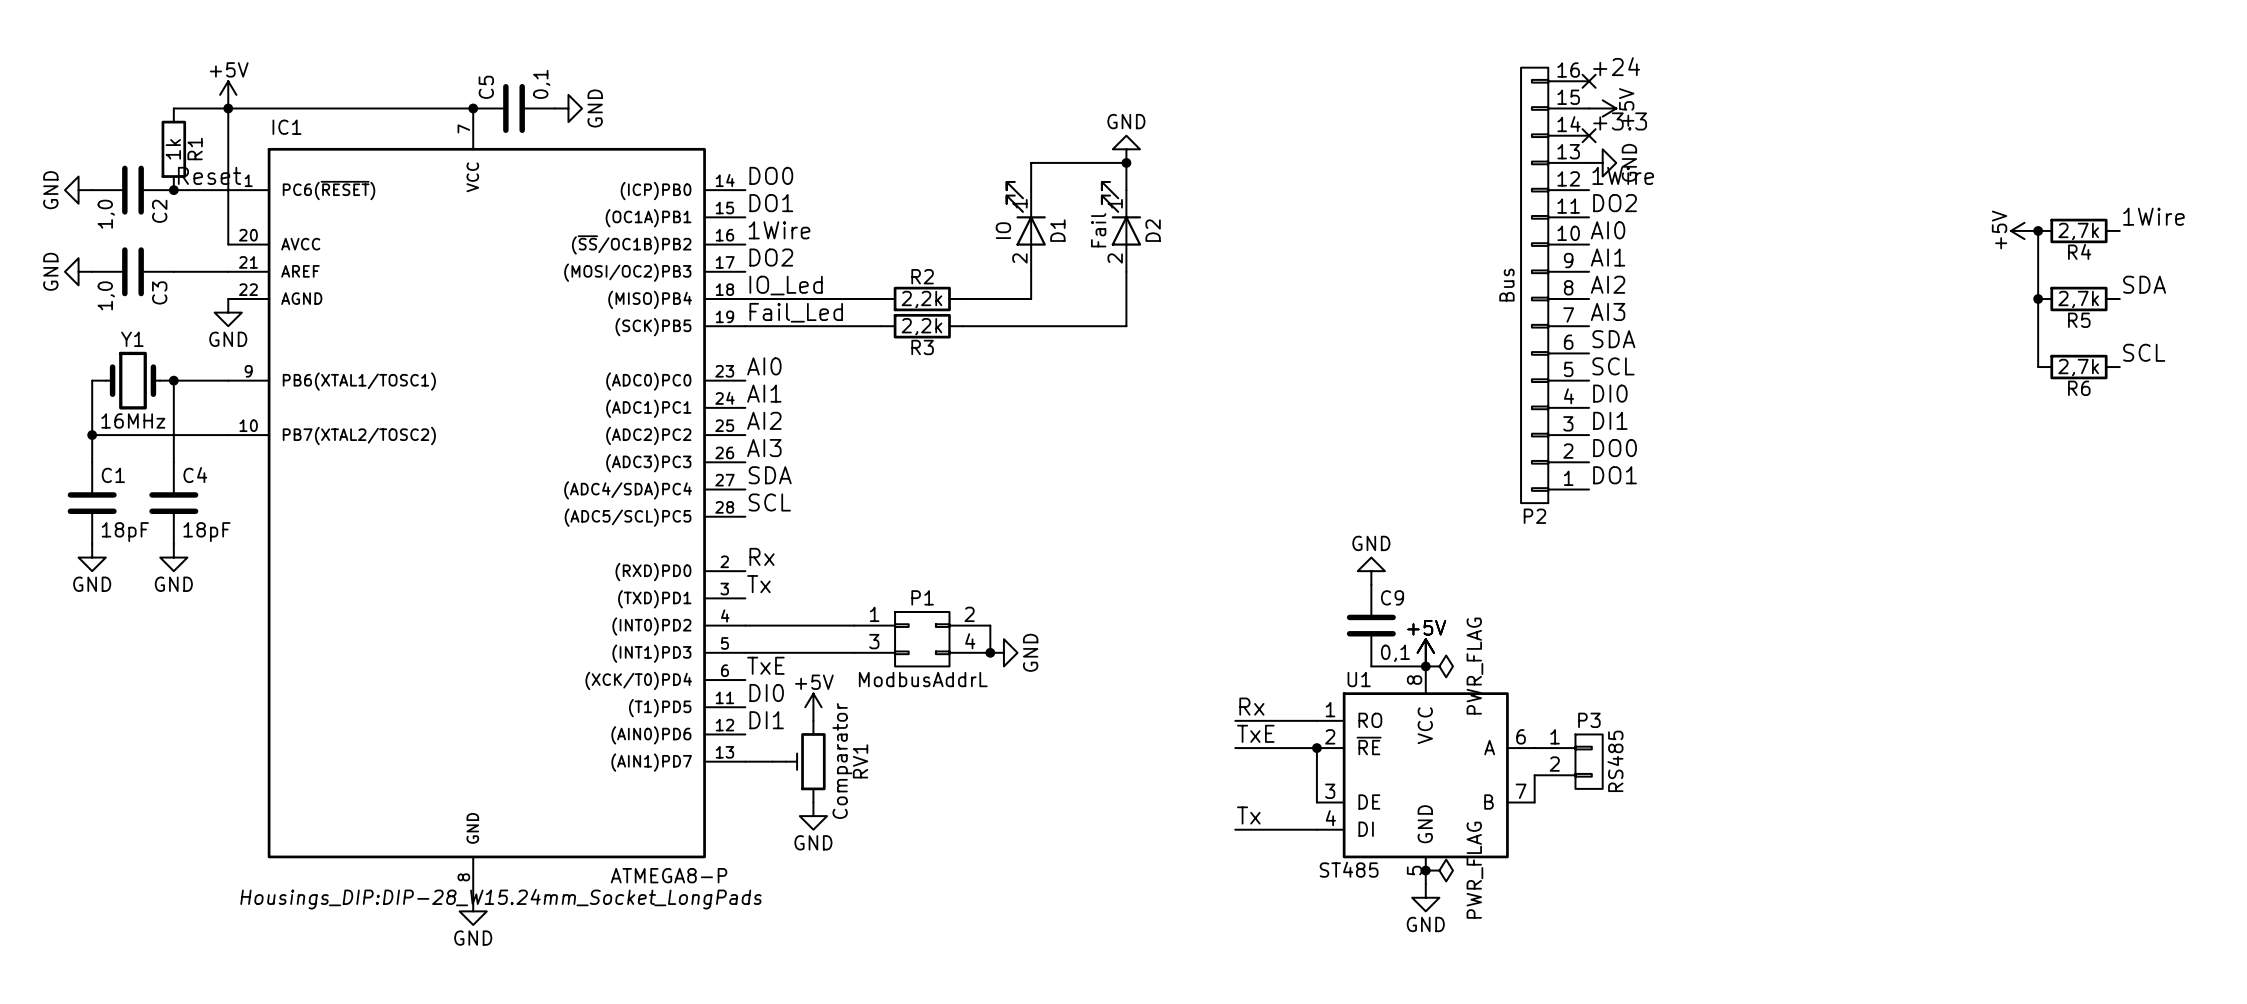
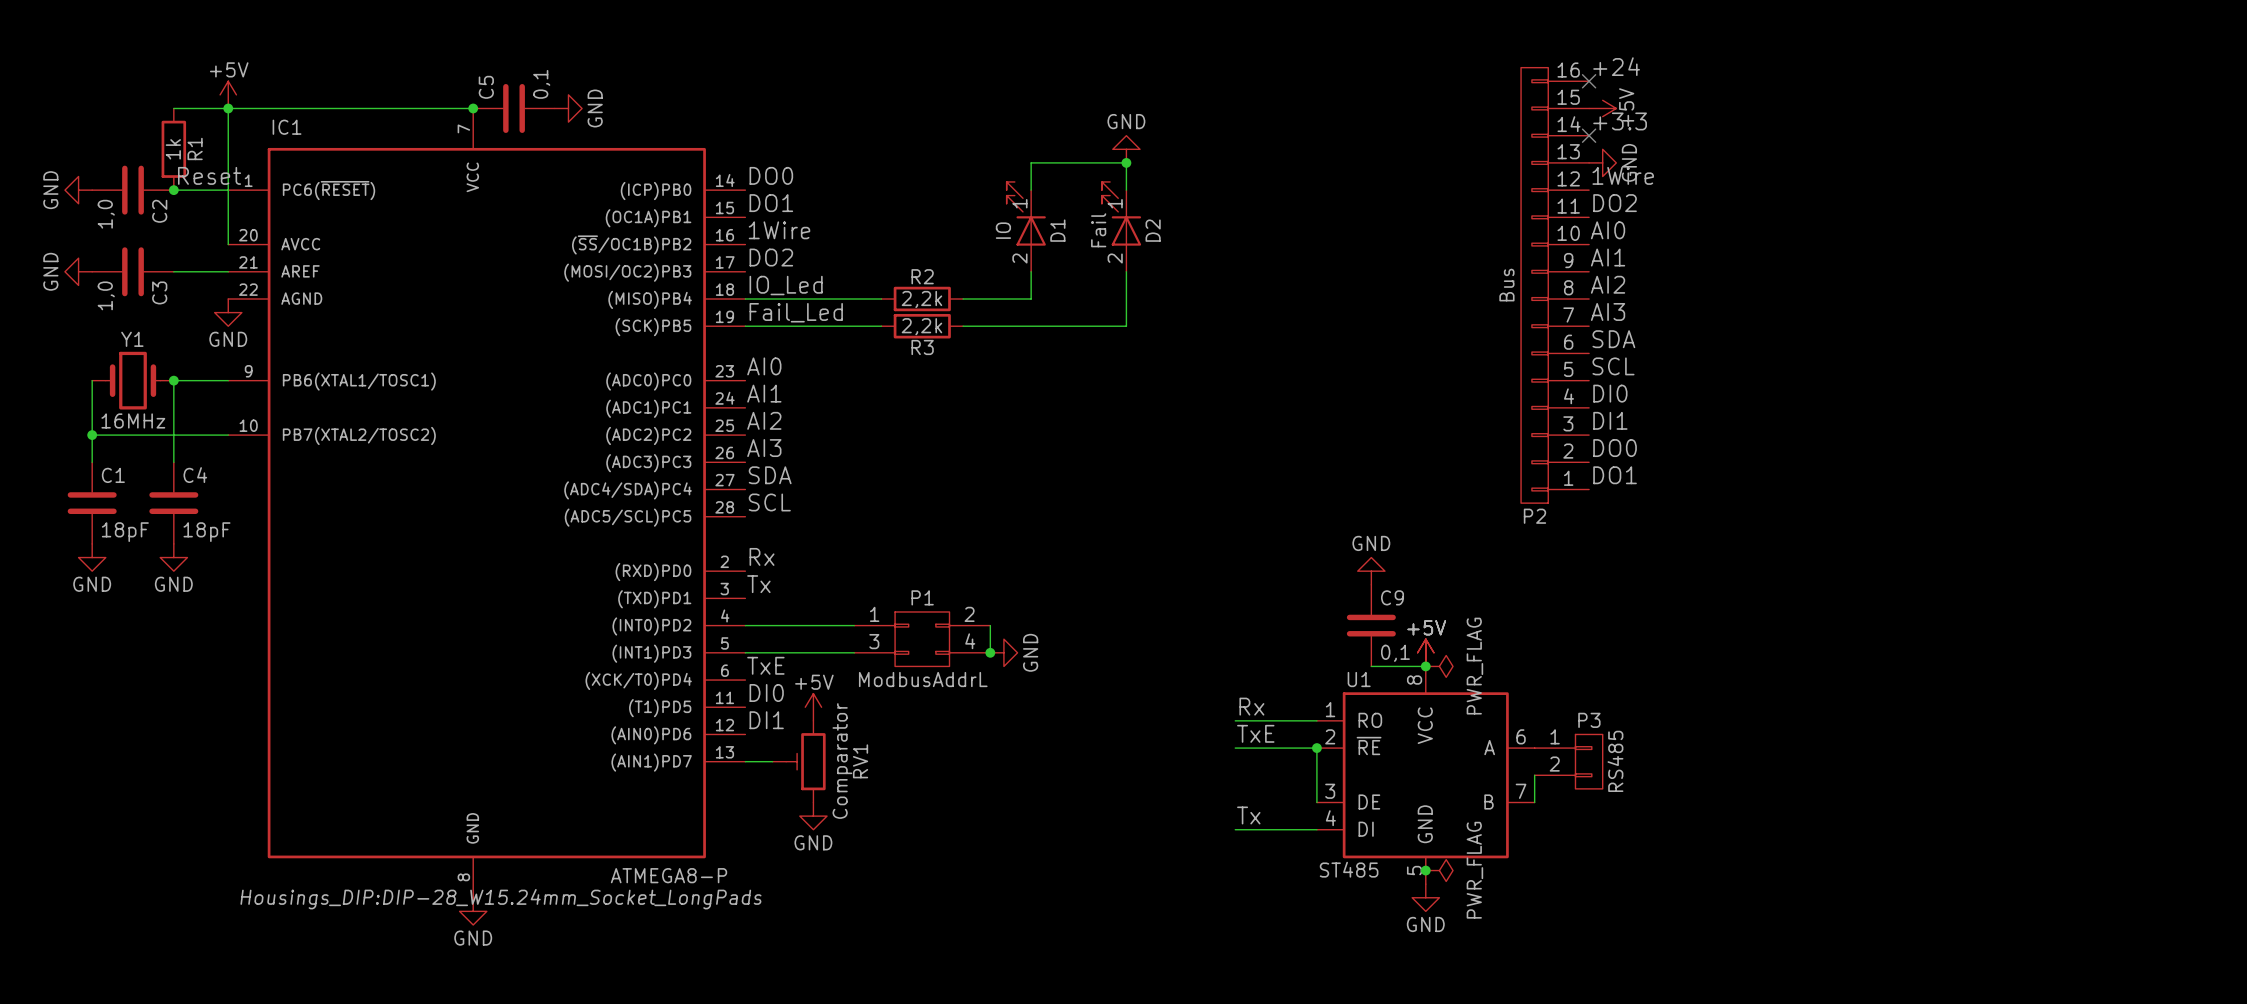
label: 1Wire (2153, 216) -> none
power symbol: +5V (2024, 230) -> none
wire: (2038, 230) (2038, 367) -> none
junction: (2038, 230) -> none
R4: 2,7k (2078, 230) -> none
label: SDA (2144, 284) -> none
junction: (2038, 299) -> none
R5: 2,7k (2078, 299) -> none
label: SCL (2144, 352) -> none
R6: 2,7k (2078, 367) -> none

